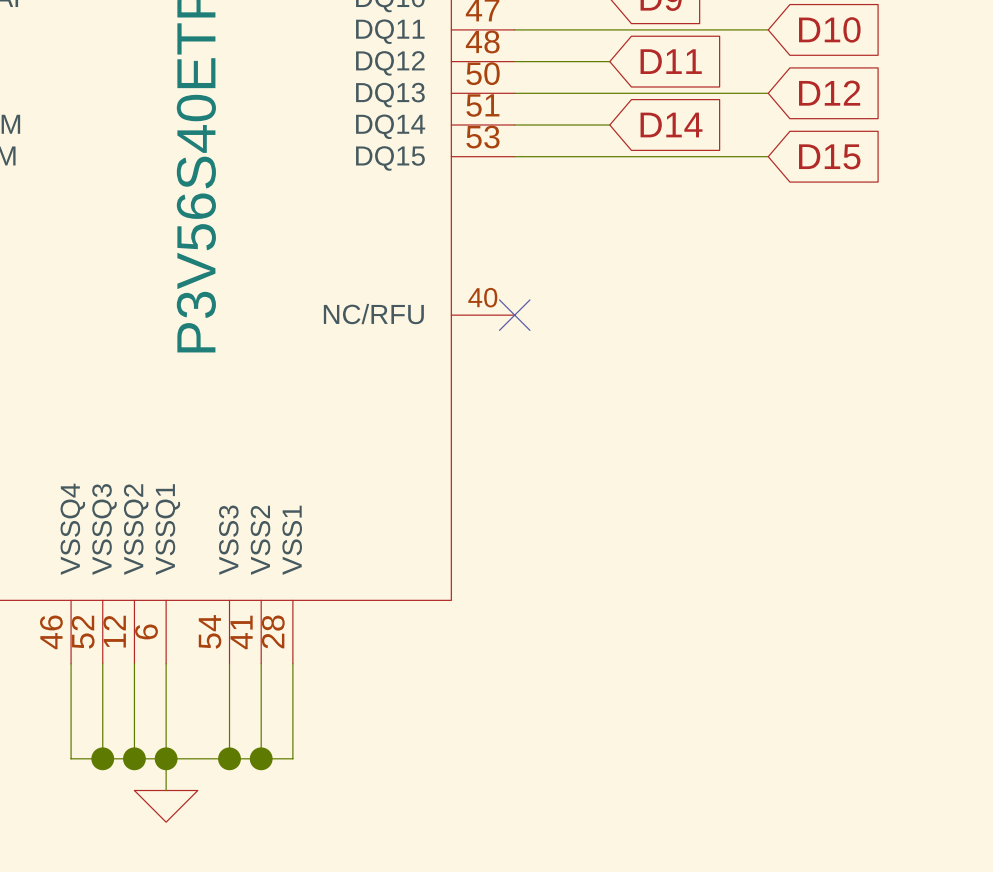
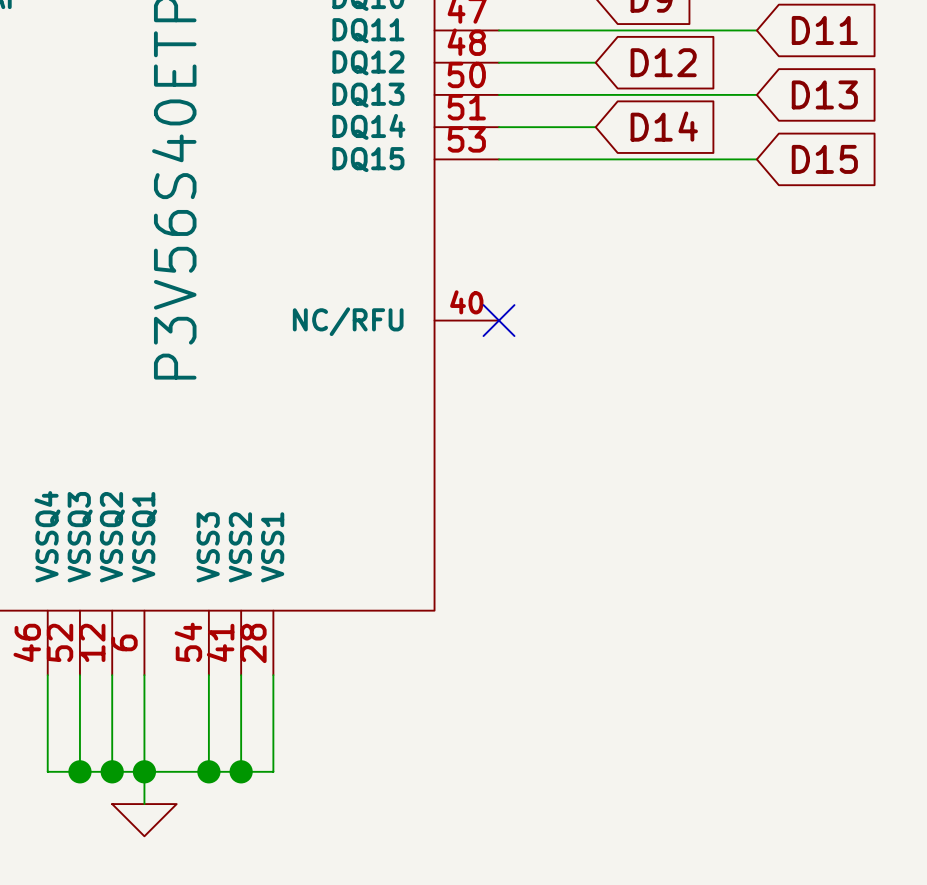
global label: D10 (829, 29) -> D11 (824, 30)
global label: D11 (671, 61) -> D12 (663, 62)
global label: D12 (829, 93) -> D13 (824, 94)

